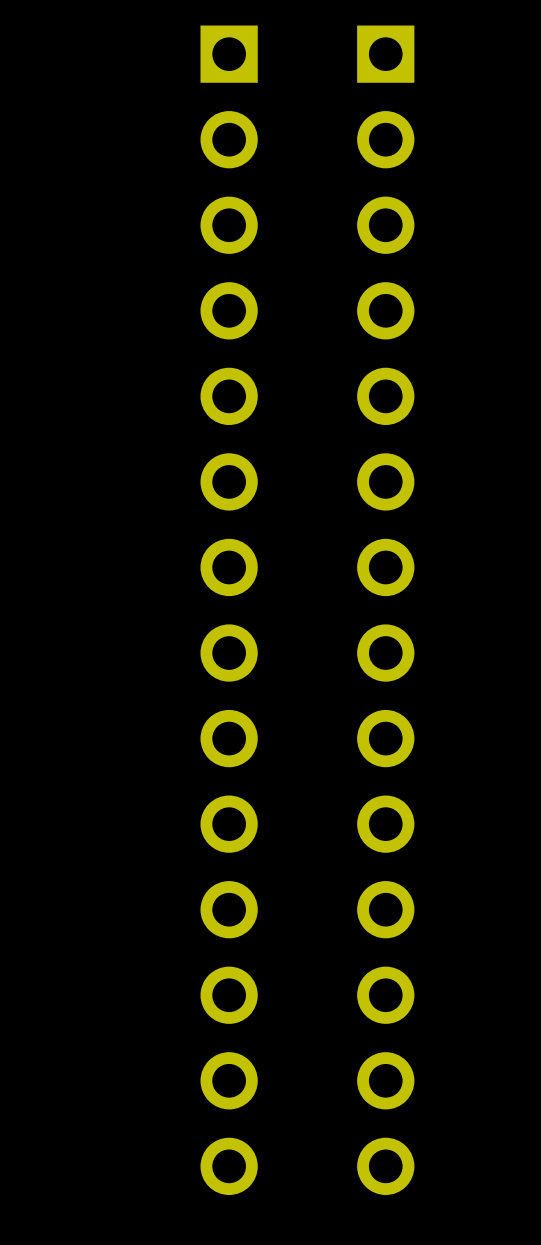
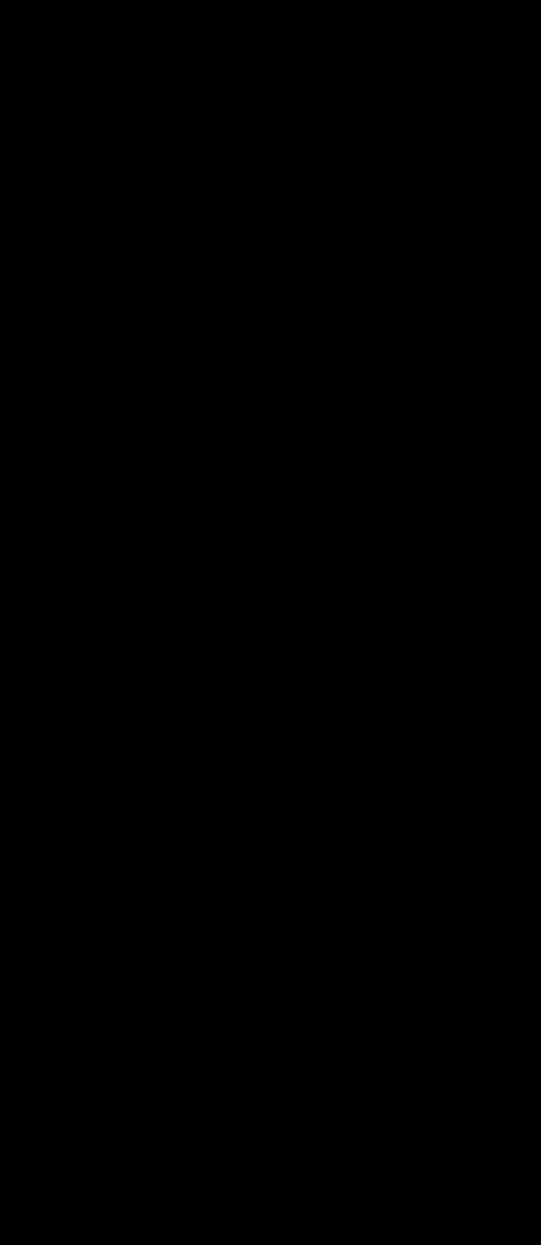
part: (229, 610) -> none
part: (385, 610) -> none

